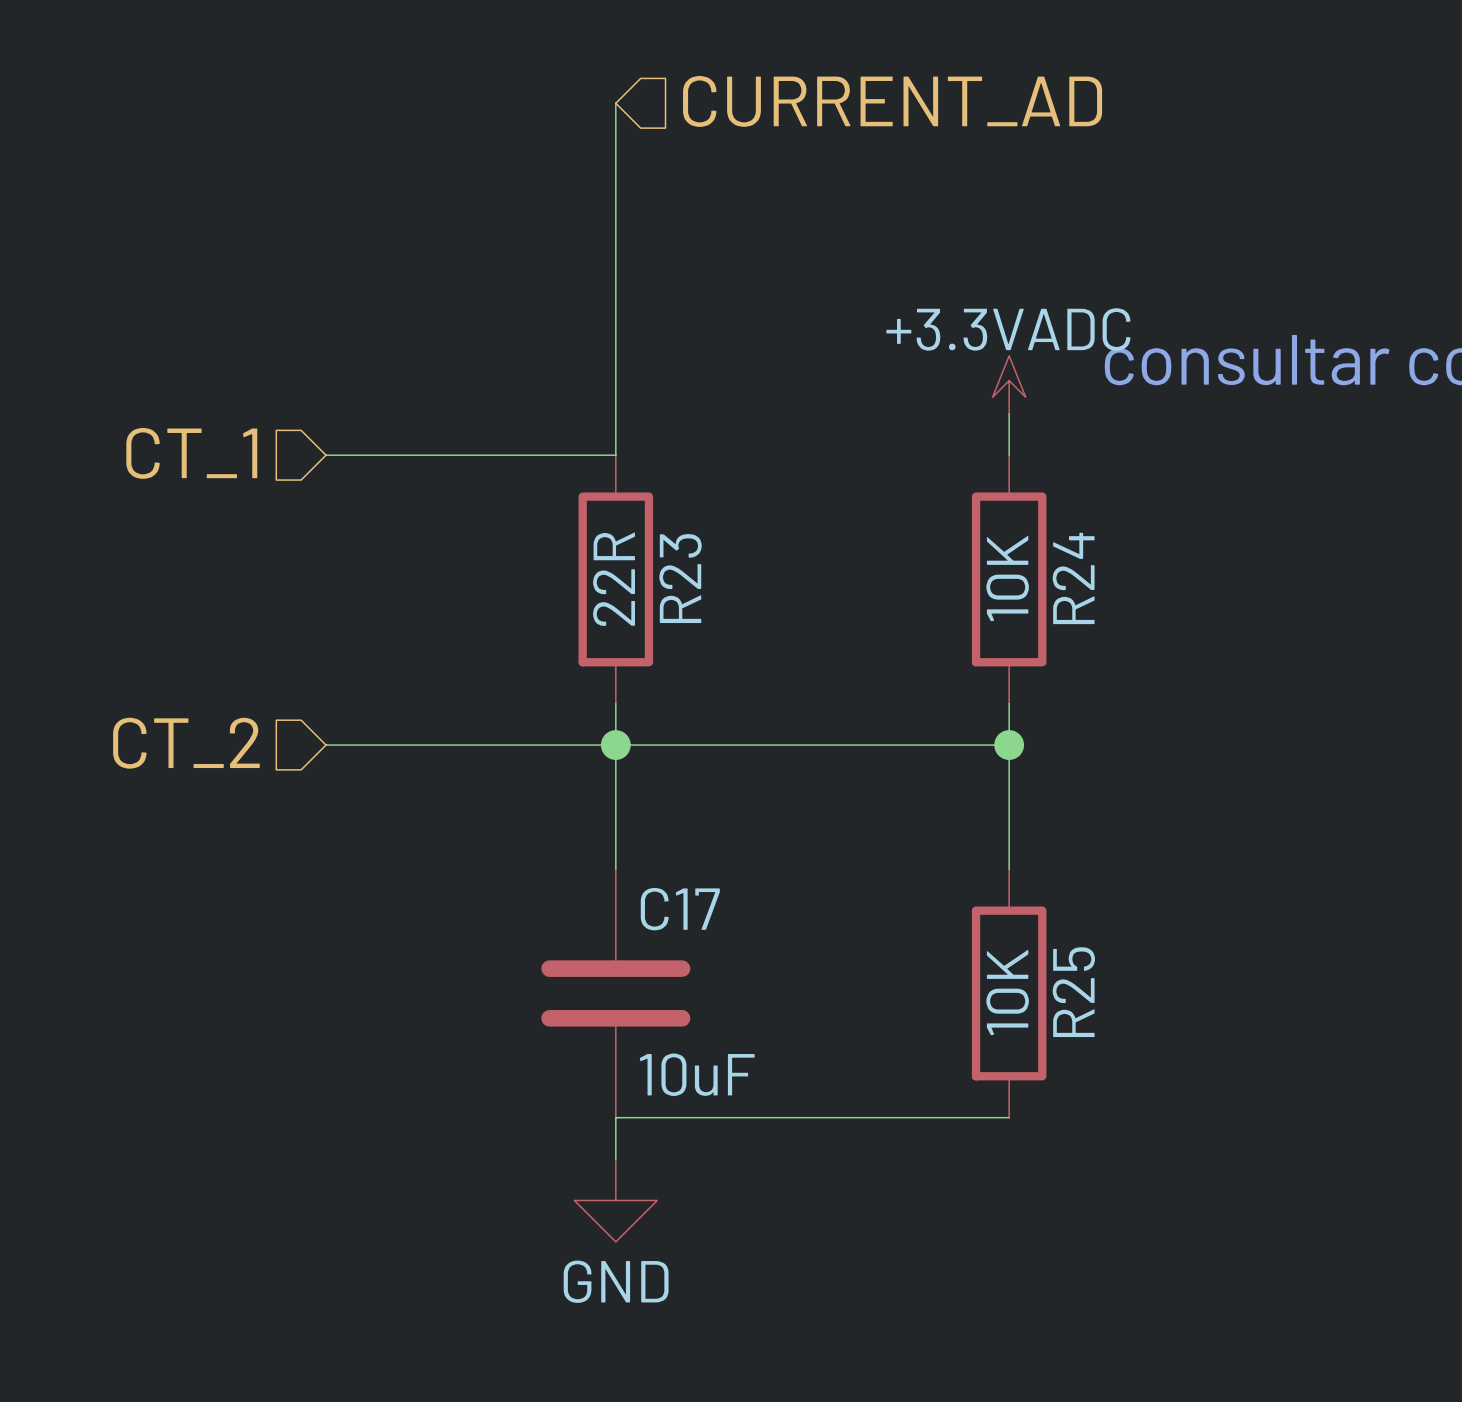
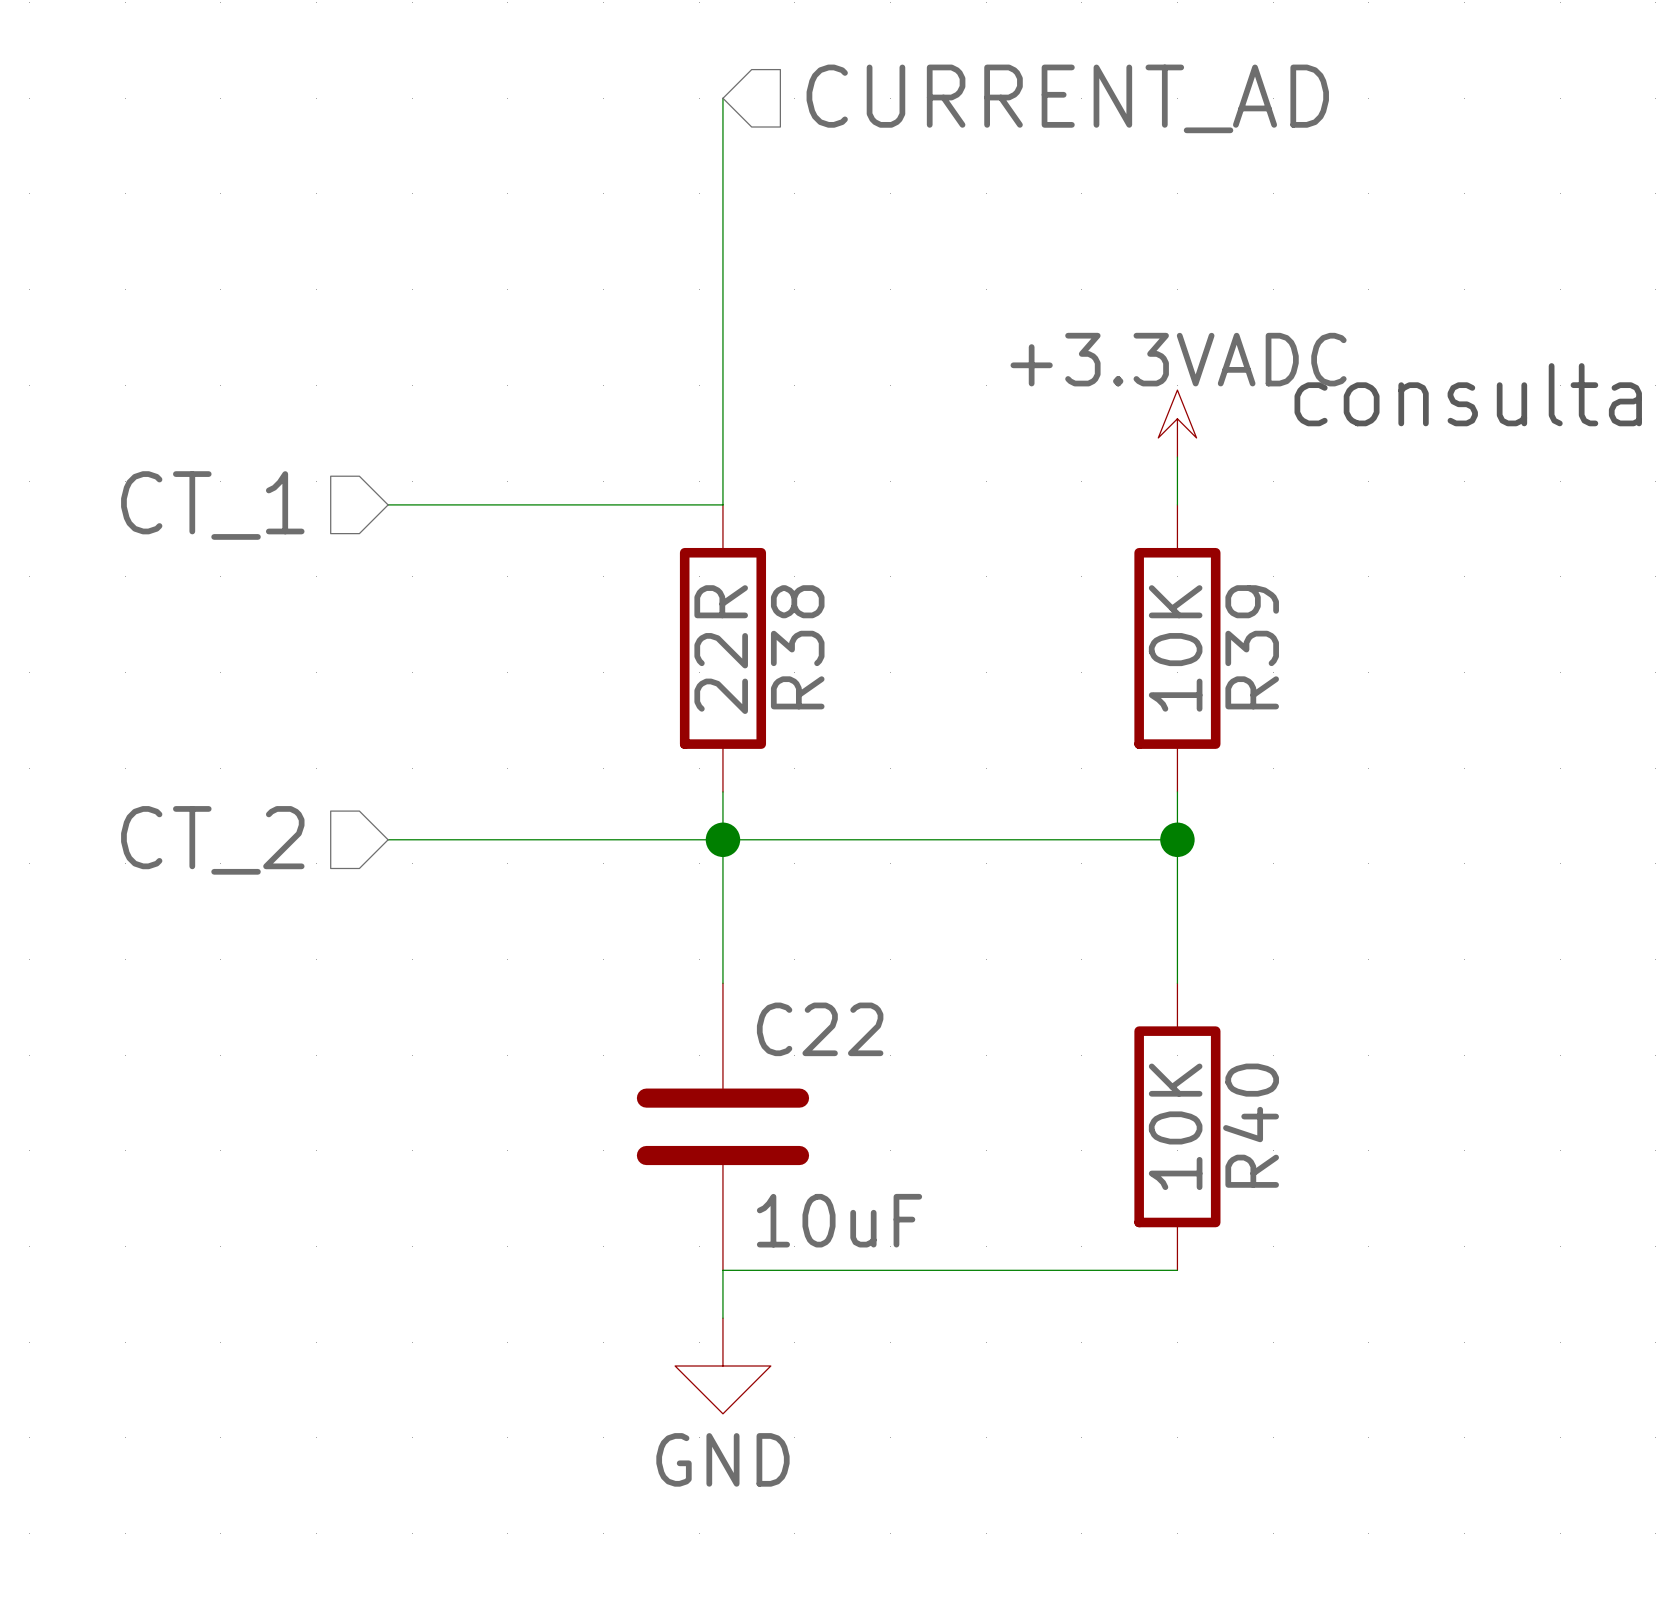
R23 name: R23 (680, 578) -> R38 (797, 647)
R24 name: R24 (1073, 578) -> R39 (1252, 647)
C17 name: C17 (680, 909) -> C22 (820, 1029)
R25 name: R25 (1073, 992) -> R40 (1251, 1125)

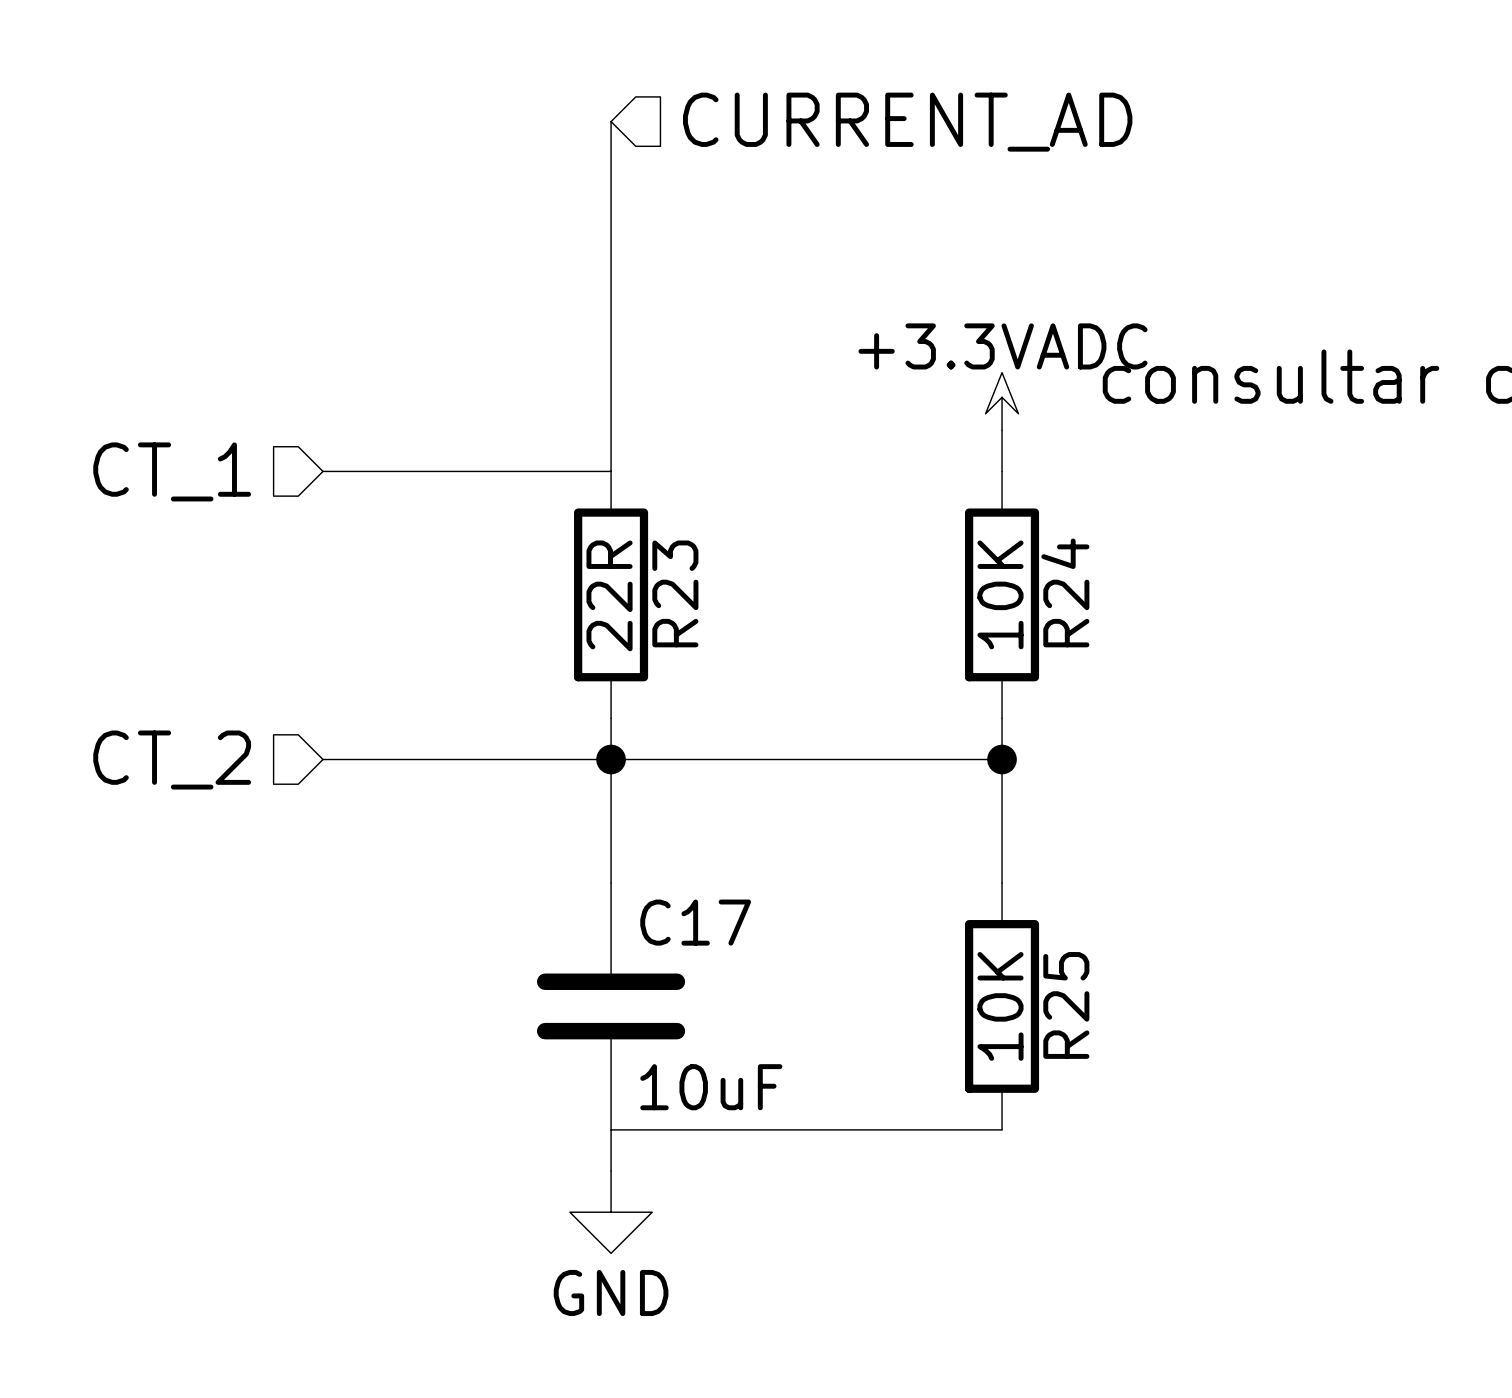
R38 name: R38 (797, 647) -> R23 (675, 593)
R39 name: R39 (1252, 647) -> R24 (1065, 592)
C22 name: C22 (820, 1029) -> C17 (695, 922)
R40 name: R40 (1251, 1125) -> R25 (1066, 1005)

